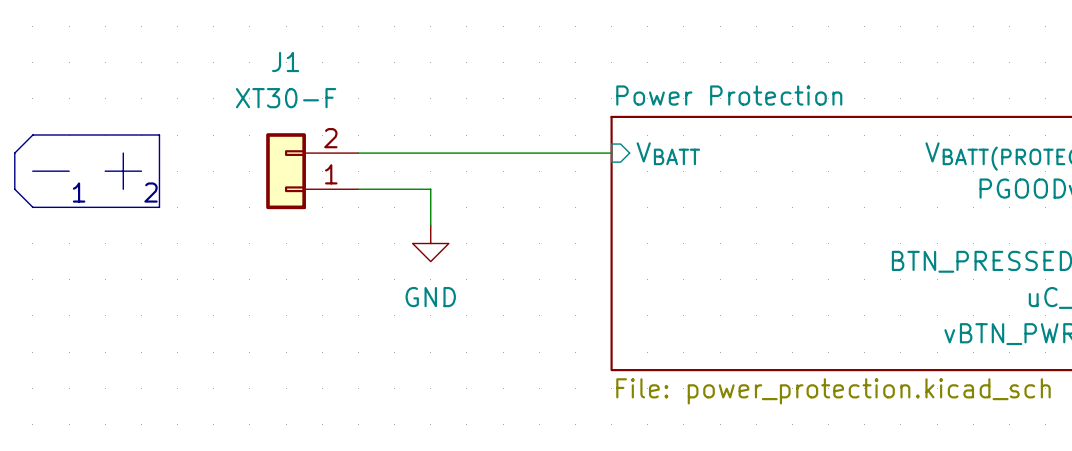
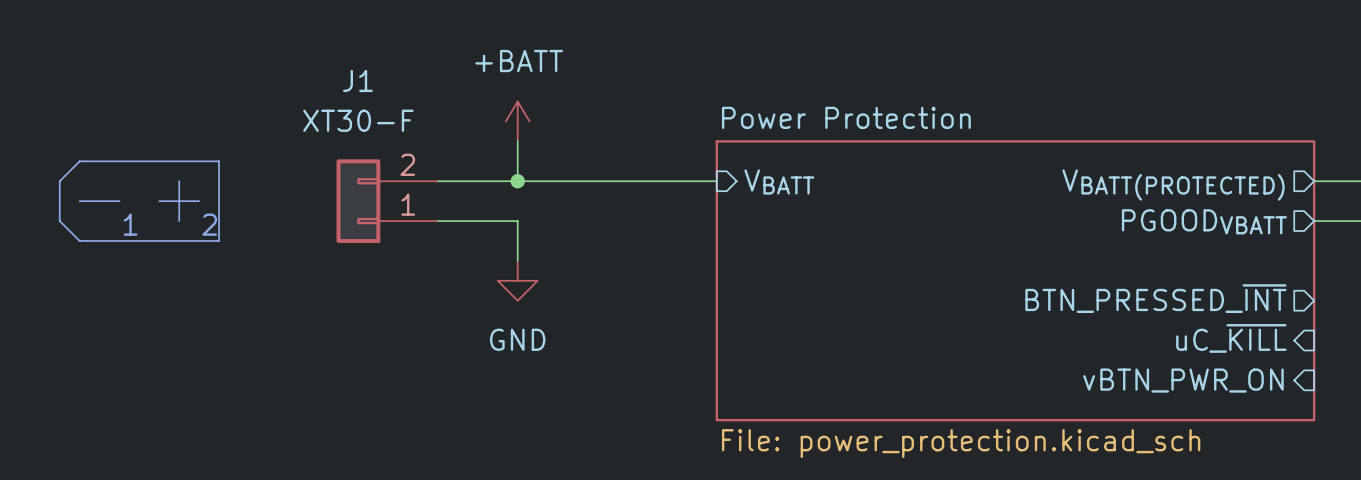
power symbol: none -> +BATT (517, 121)
wire: none -> (517, 141) (517, 181)
junction: none -> (517, 181)

